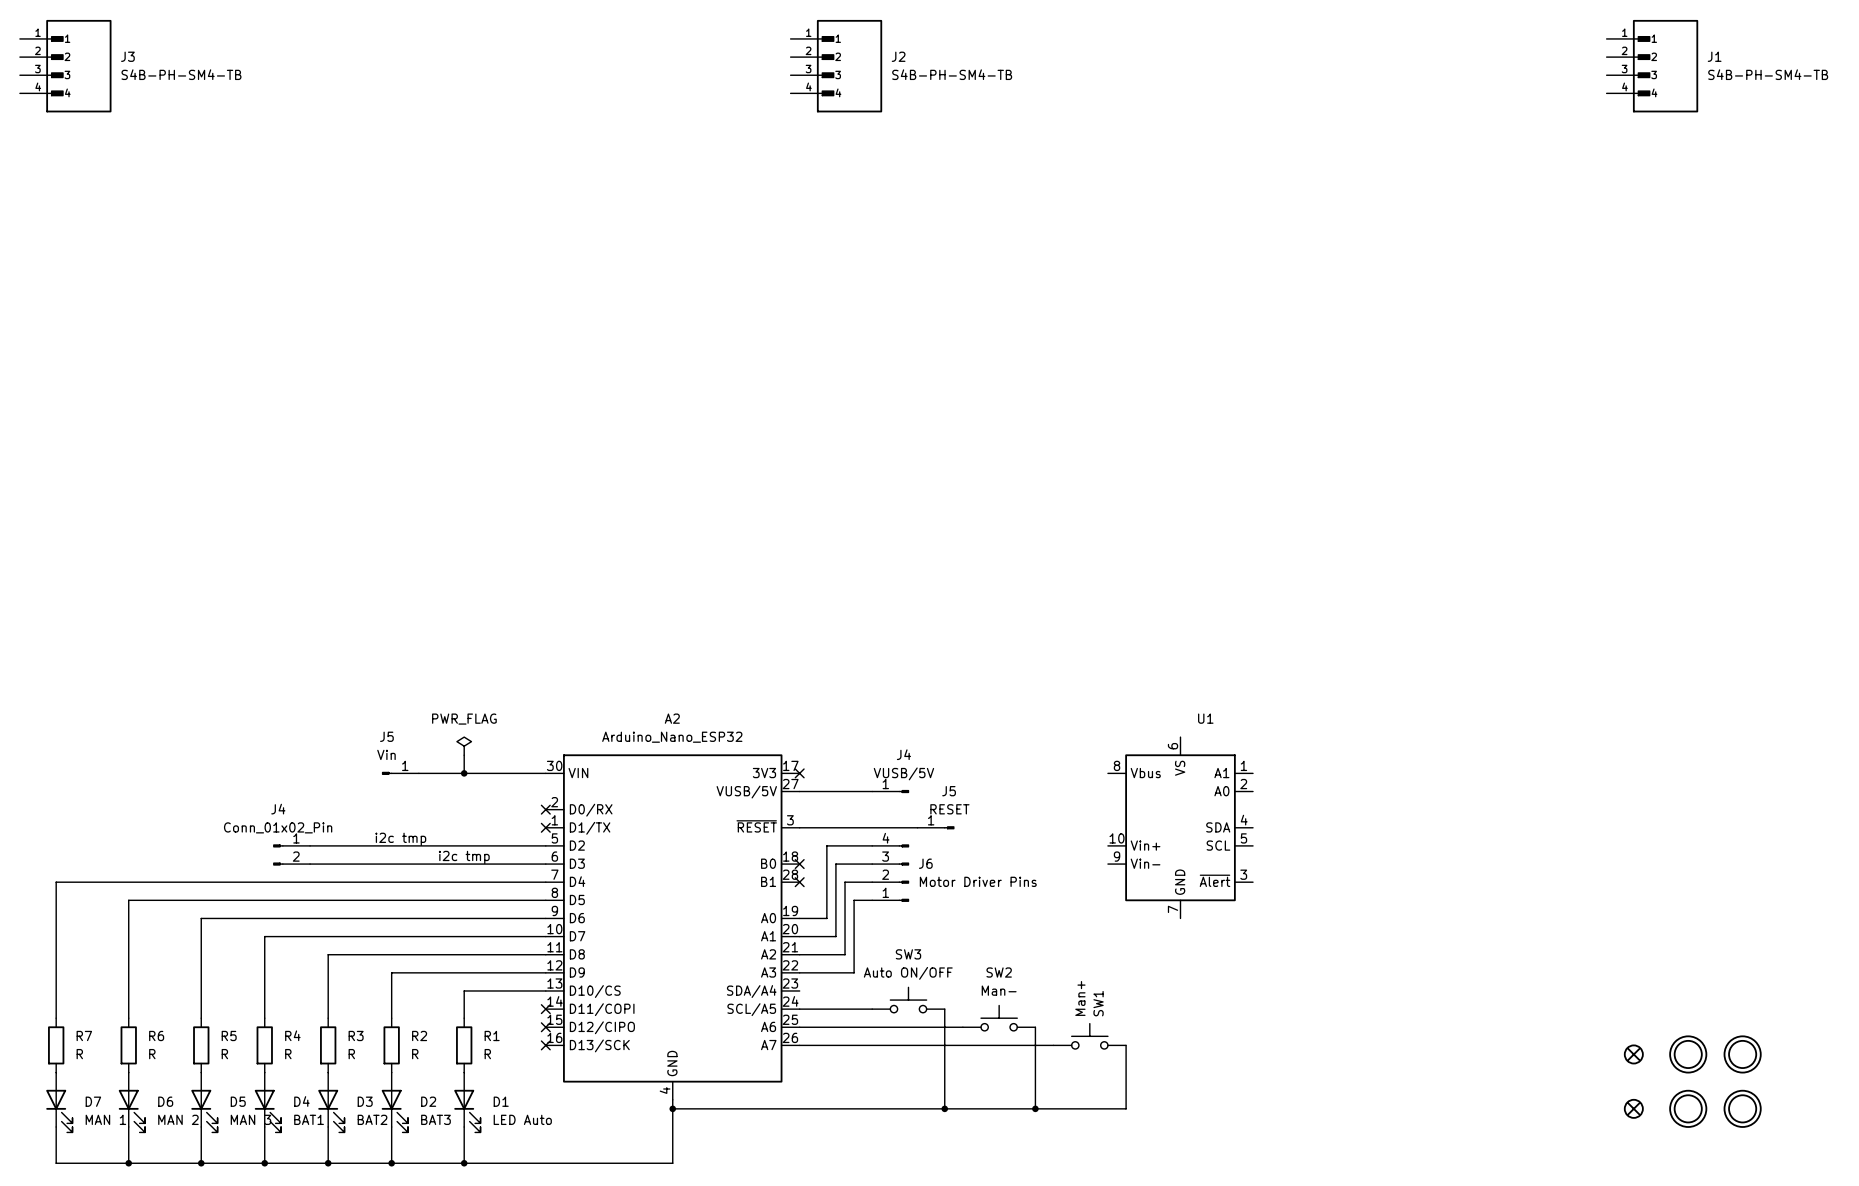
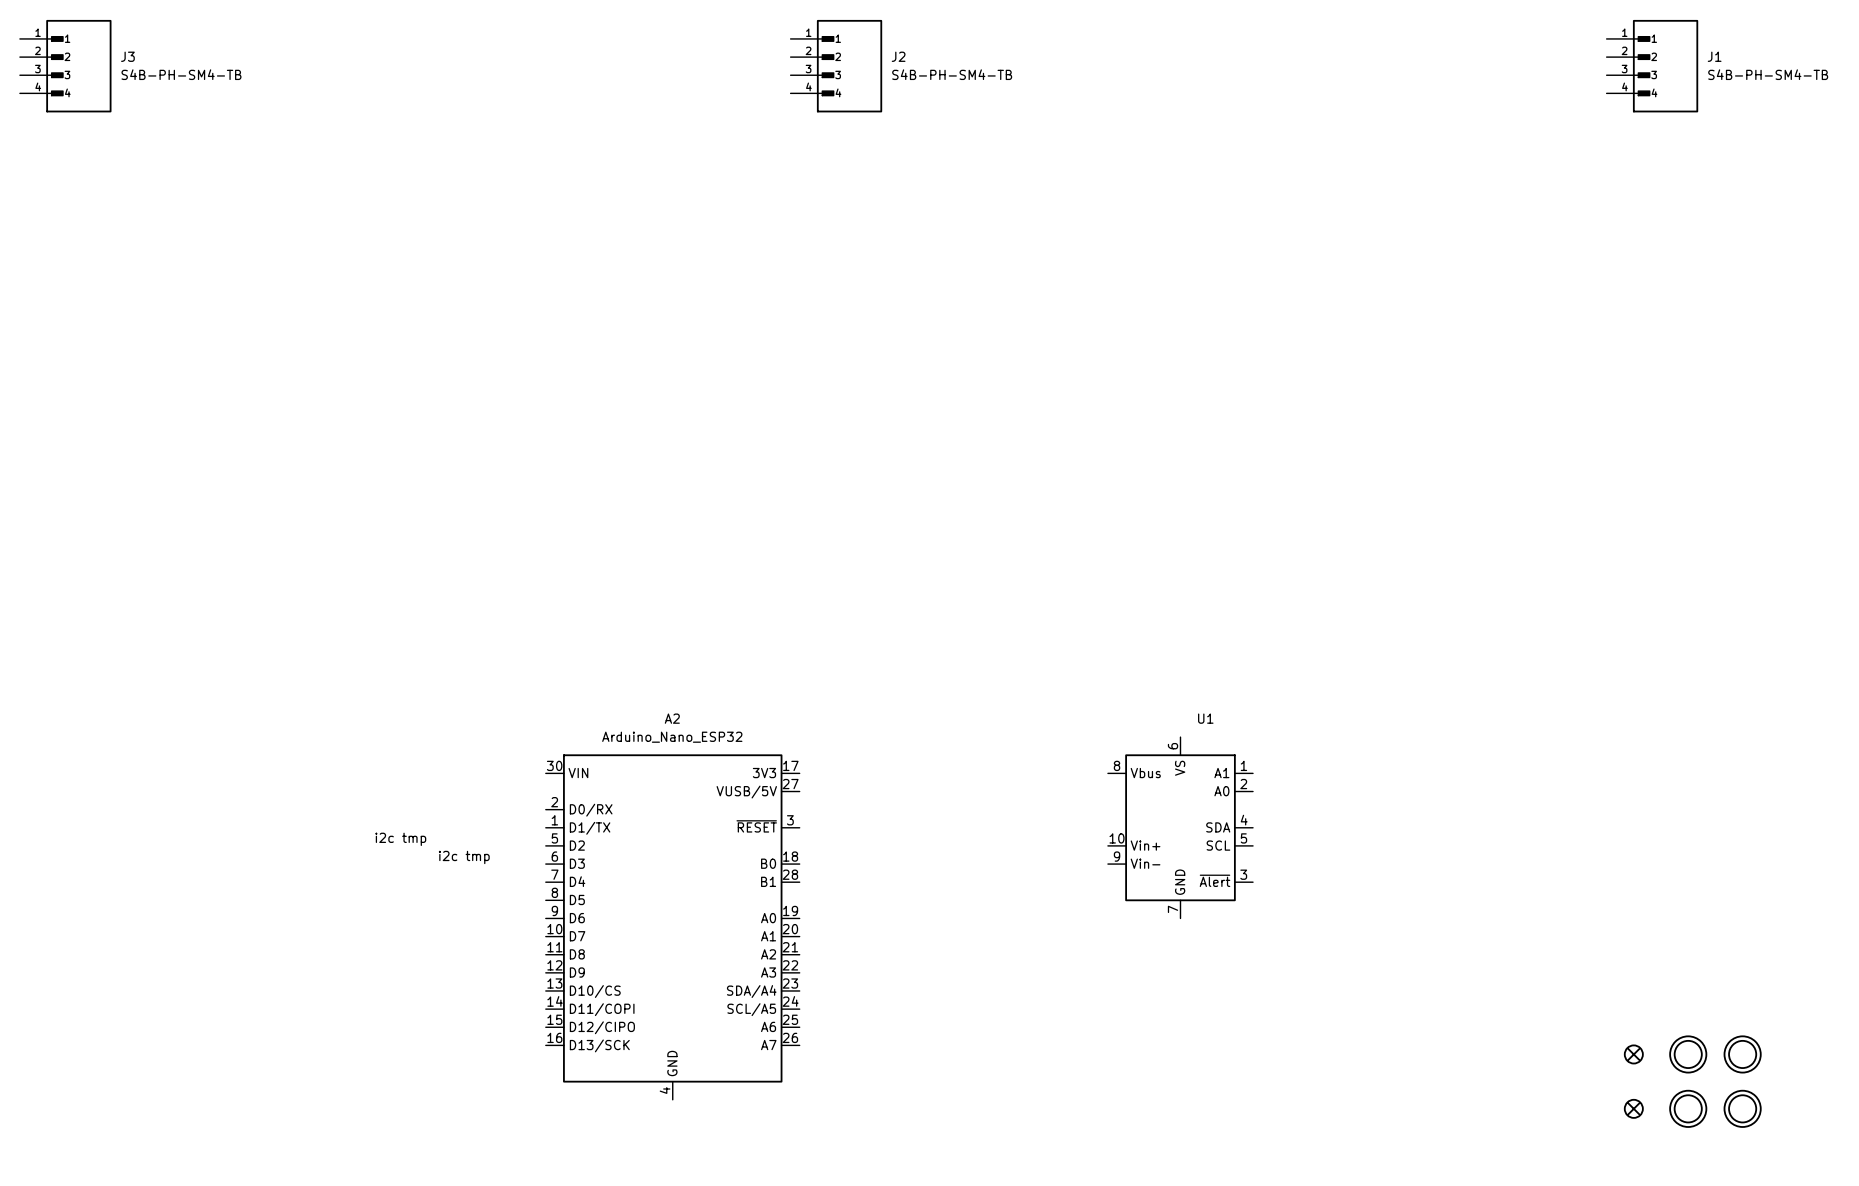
power symbol: PWR_FLAG (464, 746) -> none
wire: (464, 755) (464, 773) -> none
J5: Vin (400, 773) -> none
wire: (418, 773) (545, 773) -> none
junction: (464, 773) -> none
no-connect mark: (799, 773) -> none
wire: (799, 791) (872, 791) -> none
J4: VUSB/5V (890, 791) -> none
no-connect mark: (545, 809) -> none
no-connect mark: (545, 827) -> none
wire: (799, 827) (917, 827) -> none
J5: RESET (935, 827) -> none
wire: (310, 845) (545, 845) -> none
wire: (872, 845) (826, 845) (826, 918) (799, 918) -> none
J4: Conn_01x02_Pin (291, 854) -> none
wire: (310, 864) (545, 864) -> none
no-connect mark: (799, 864) -> none
wire: (872, 864) (835, 864) (835, 936) (799, 936) -> none
J6: Motor Driver Pins (890, 873) -> none
wire: (545, 882) (56, 882) (56, 1018) -> none
no-connect mark: (799, 882) -> none
wire: (872, 882) (845, 882) (845, 954) (799, 954) -> none
wire: (545, 900) (128, 900) (128, 1018) -> none
wire: (872, 900) (854, 900) (854, 972) (799, 972) -> none
wire: (545, 918) (201, 918) (201, 1018) -> none
wire: (545, 936) (264, 936) (264, 1018) -> none
wire: (545, 954) (328, 954) (328, 1018) -> none
wire: (545, 972) (391, 972) (391, 1018) -> none
wire: (545, 990) (464, 990) (464, 1018) -> none
SW3: Auto ON/OFF (908, 1000) -> none
no-connect mark: (545, 1009) -> none
wire: (799, 1009) (872, 1009) -> none
wire: (944, 1009) (944, 1108) -> none
SW2: Man- (999, 1018) -> none
no-connect mark: (545, 1027) -> none
wire: (799, 1027) (962, 1027) -> none
wire: (1035, 1027) (1035, 1108) -> none
SW1: Man+ (1089, 1036) -> none
R7: R (56, 1045) -> none
R6: R (128, 1045) -> none
R5: R (201, 1045) -> none
R4: R (264, 1045) -> none
R3: R (328, 1045) -> none
R2: R (391, 1045) -> none
R1: R (464, 1045) -> none
no-connect mark: (545, 1045) -> none
wire: (799, 1045) (1053, 1045) -> none
wire: (1126, 1045) (1126, 1108) (672, 1108) -> none
wire: (672, 1099) (672, 1163) (56, 1163) (56, 1126) -> none
D7: MAN 1 (59, 1102) -> none
D6: MAN 2 (131, 1102) -> none
D5: MAN 3 (204, 1102) -> none
D4: BAT1 (267, 1102) -> none
D3: BAT2 (331, 1102) -> none
D2: BAT3 (394, 1102) -> none
D1: LED Auto (467, 1102) -> none
junction: (672, 1108) -> none
junction: (944, 1108) -> none
junction: (1035, 1108) -> none
wire: (128, 1126) (128, 1163) -> none
wire: (201, 1126) (201, 1163) -> none
wire: (264, 1126) (264, 1163) -> none
wire: (328, 1126) (328, 1163) -> none
wire: (391, 1126) (391, 1163) -> none
wire: (464, 1126) (464, 1163) -> none
junction: (128, 1163) -> none
junction: (201, 1163) -> none
junction: (264, 1163) -> none
junction: (328, 1163) -> none
junction: (391, 1163) -> none
junction: (464, 1163) -> none

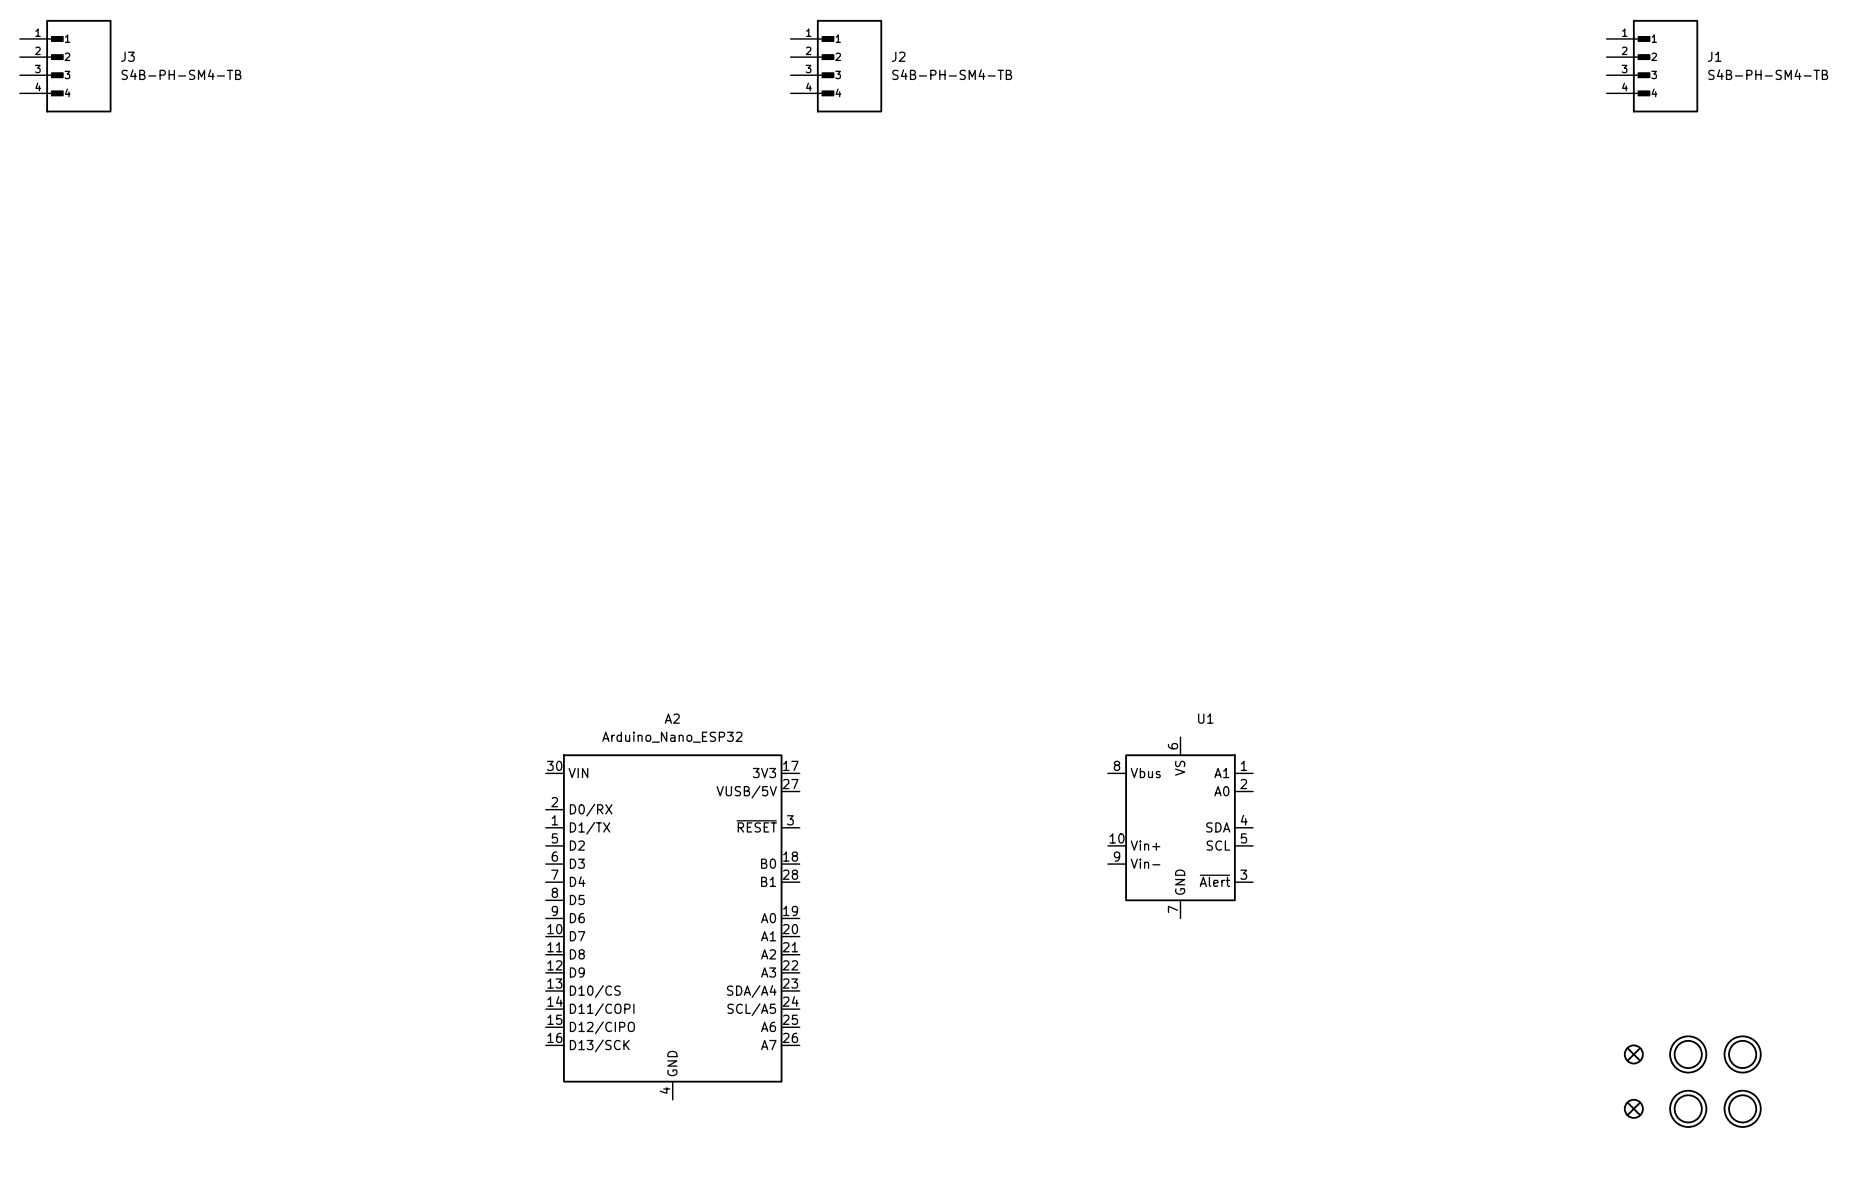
label: i2c tmp (400, 839) -> none
label: i2c tmp (464, 857) -> none

